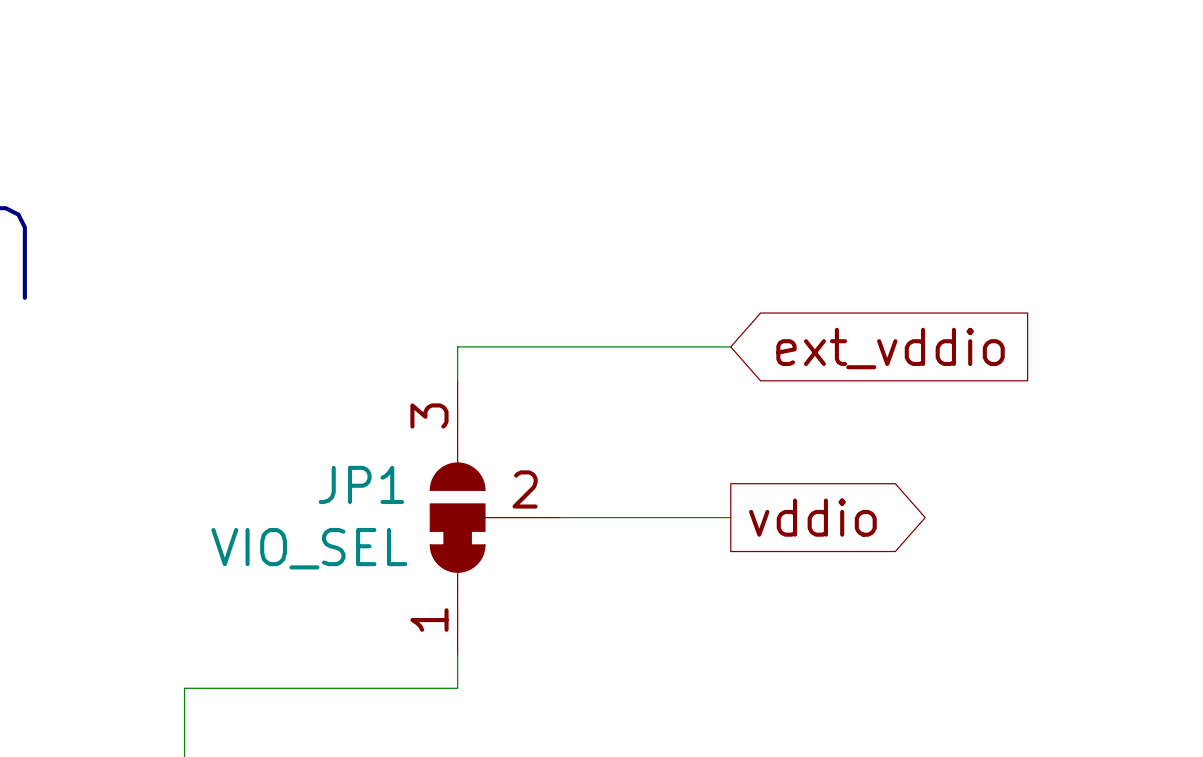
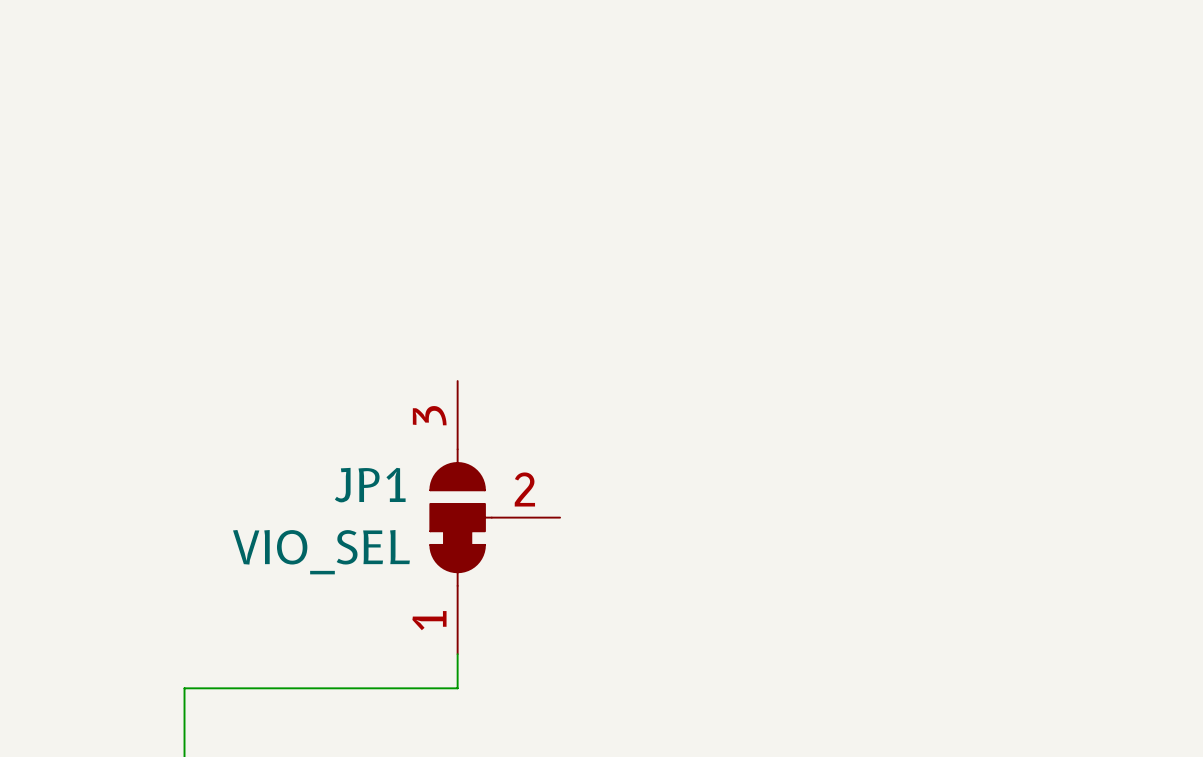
wire: (730, 346) (457, 346) (457, 381) -> none
global label: ext_vddio (890, 348) -> none
wire: (560, 517) (730, 517) -> none
global label: vddio (812, 517) -> none

